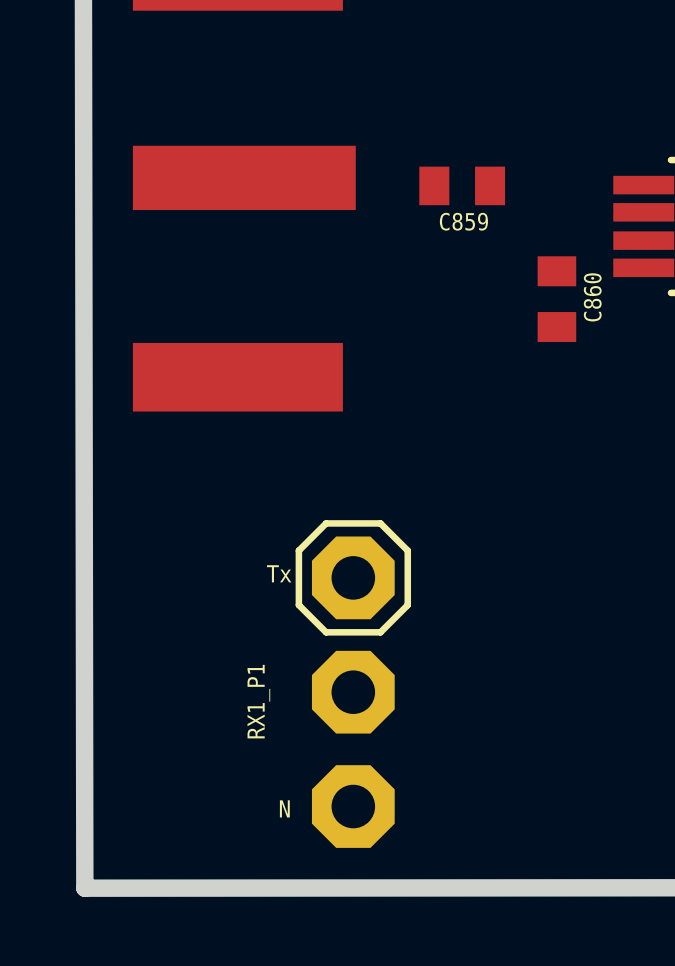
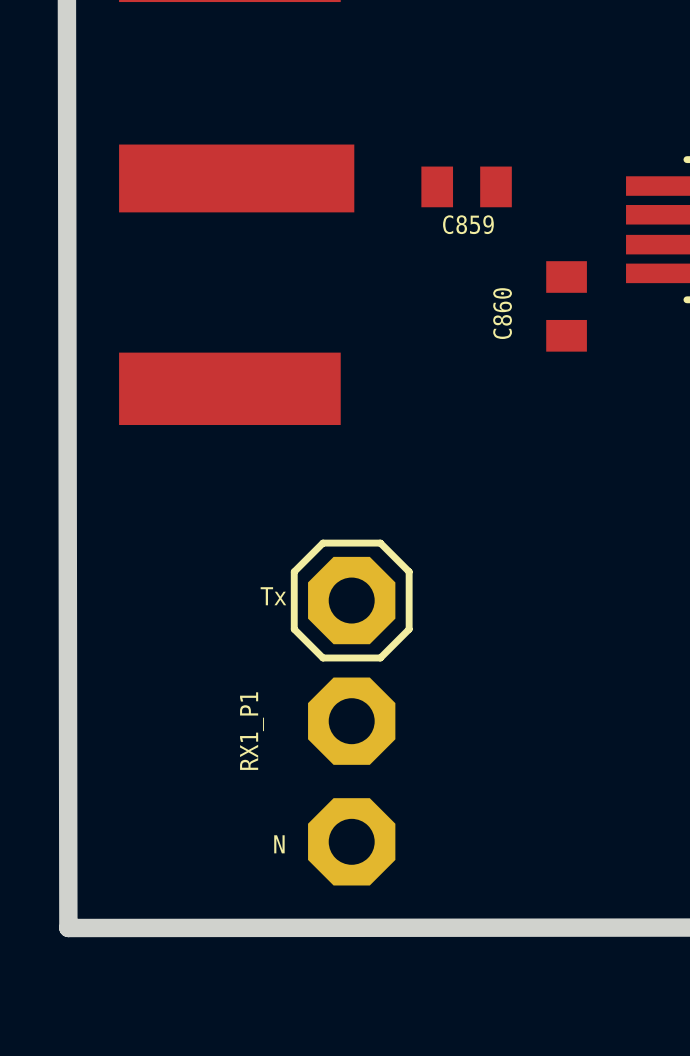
C860 name position: C860 (592, 297) -> C860 (502, 313)

